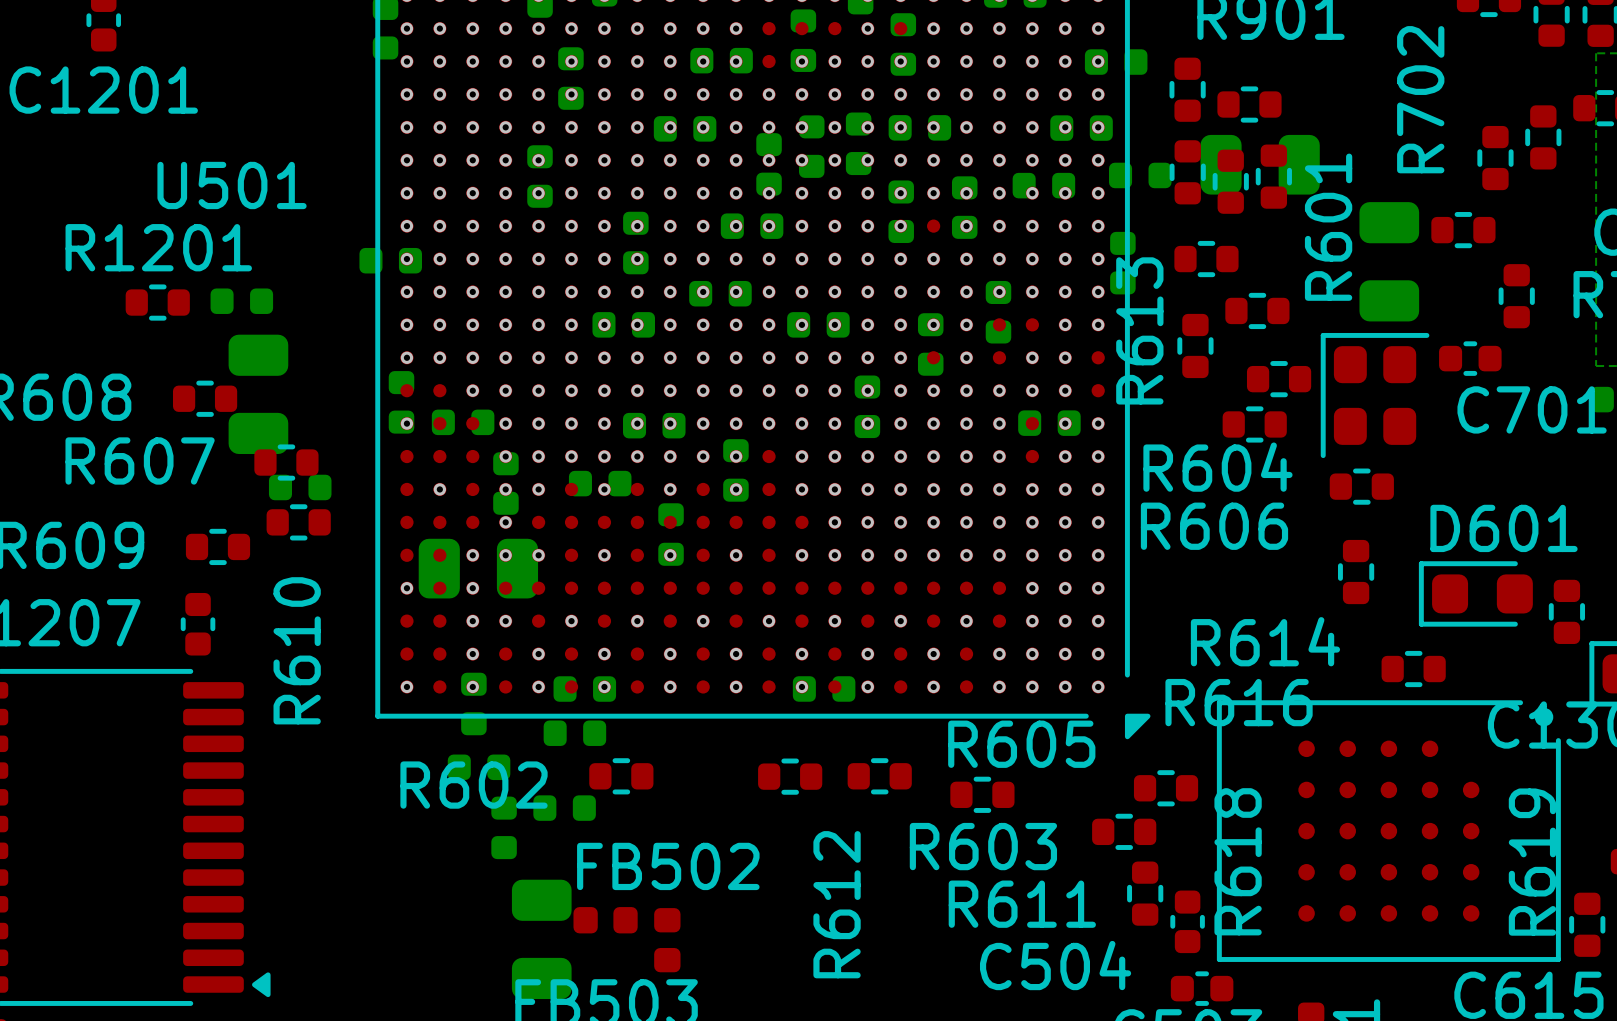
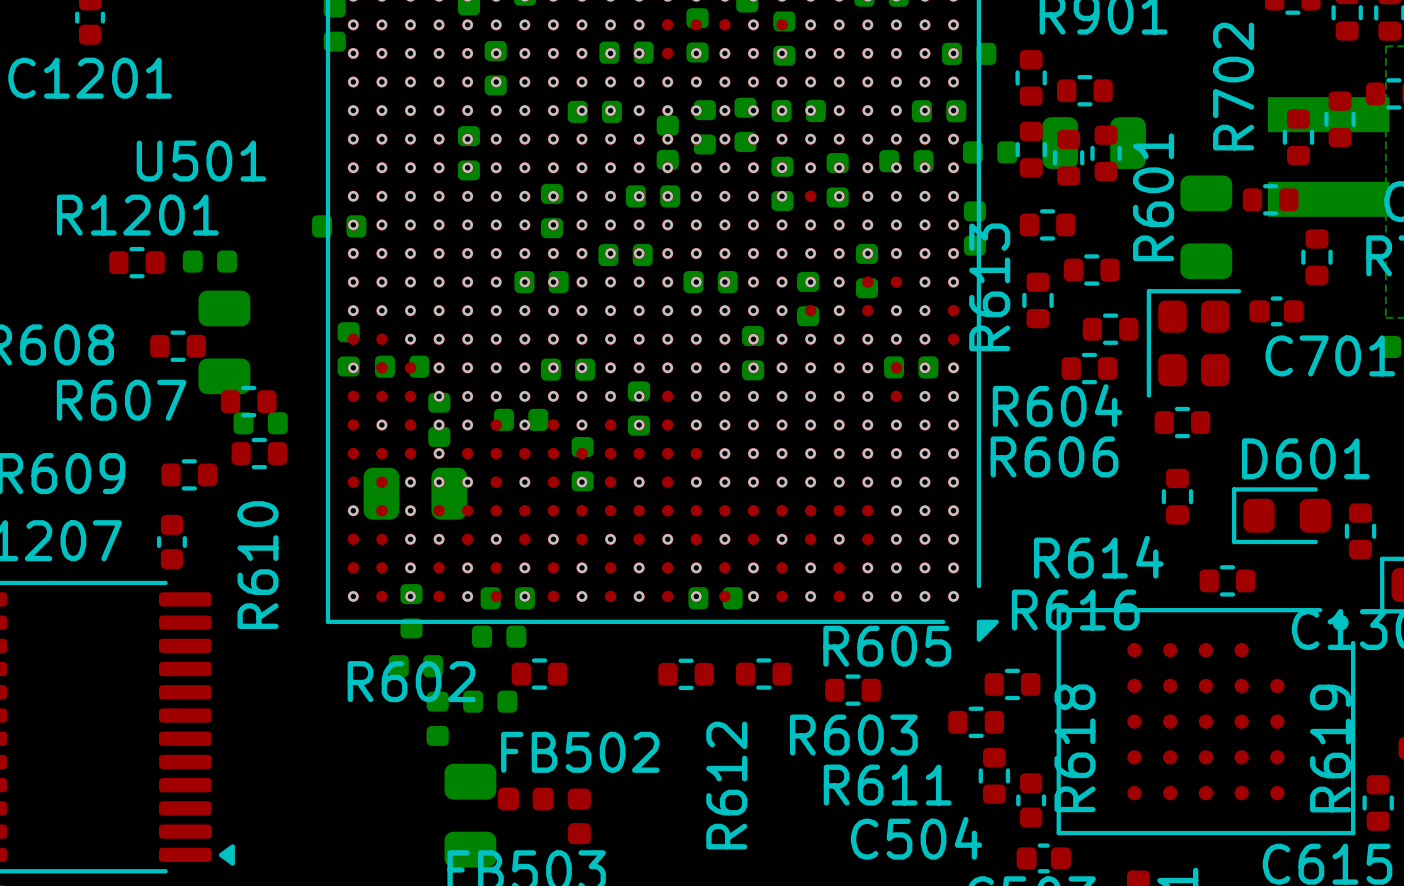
part: none -> (1328, 156)

